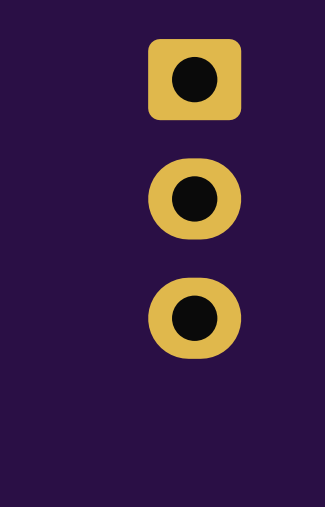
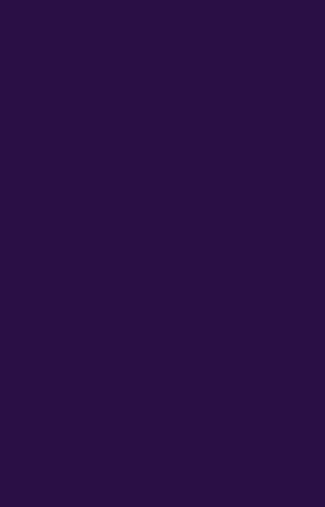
part: (194, 198) -> none

